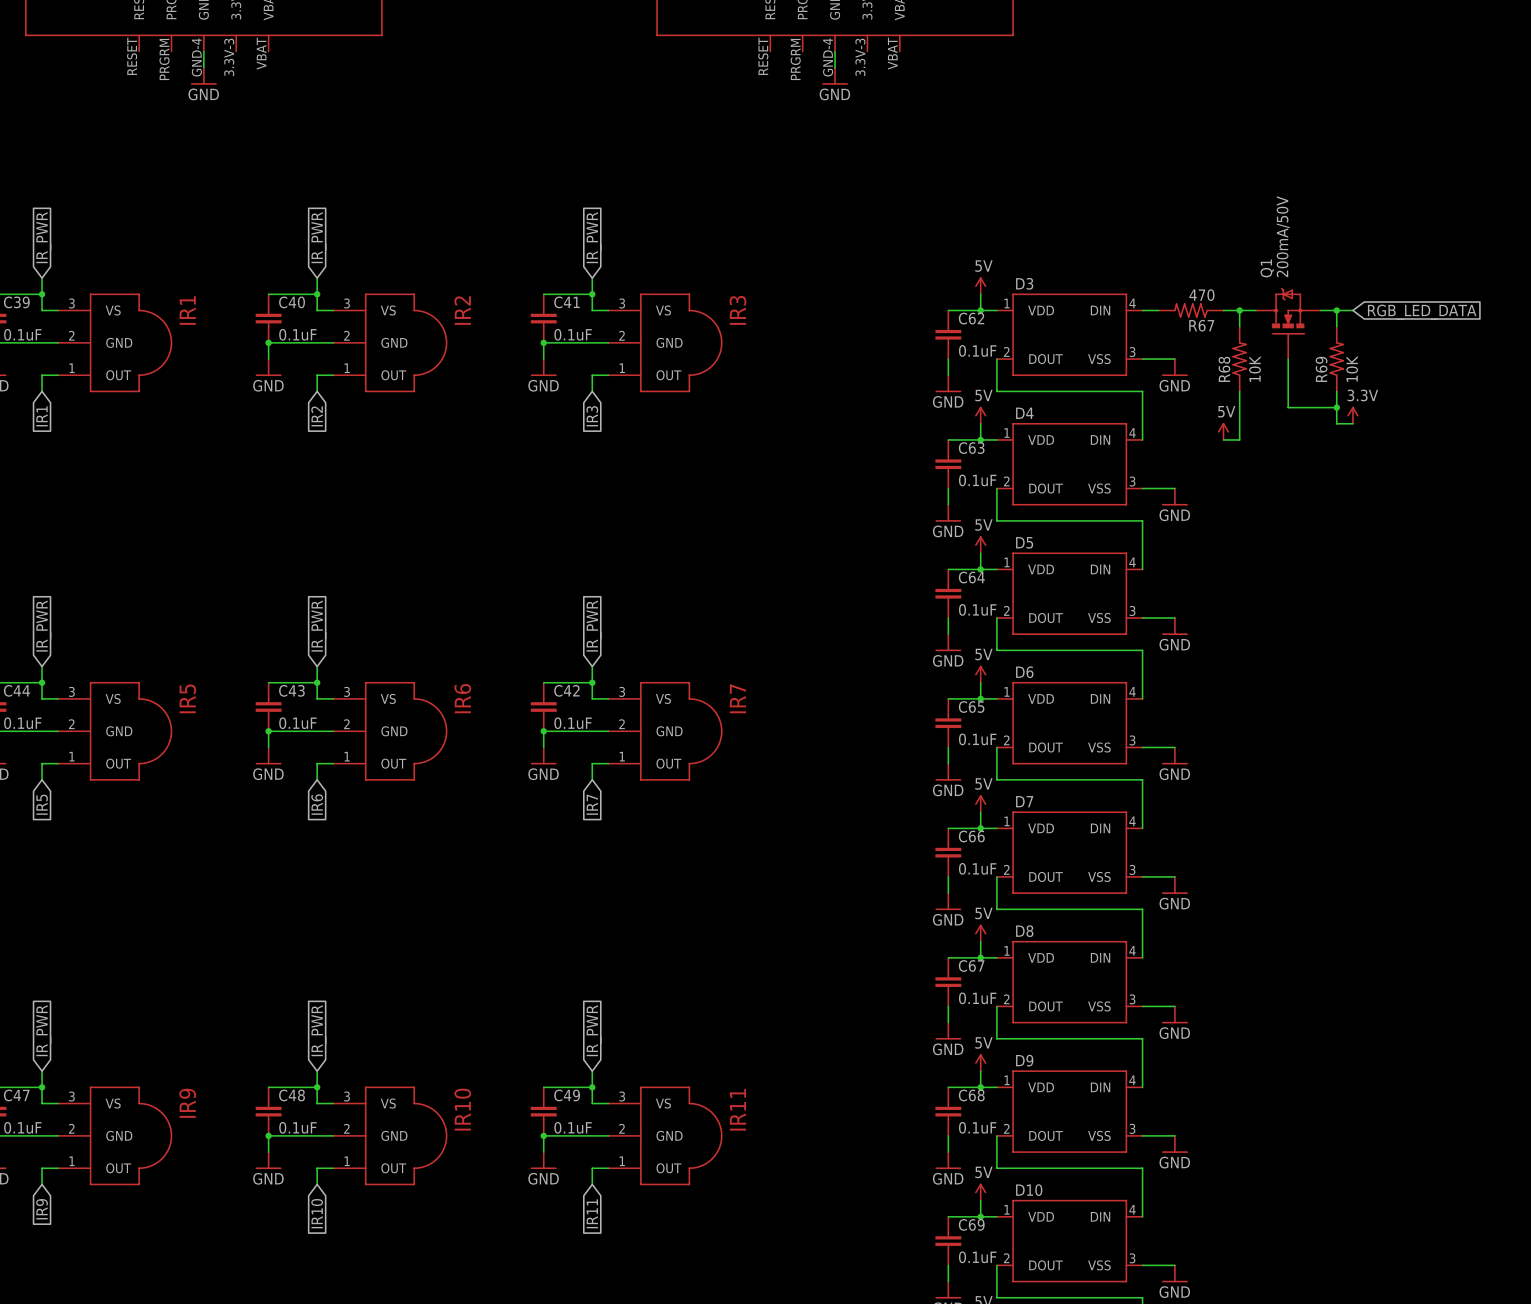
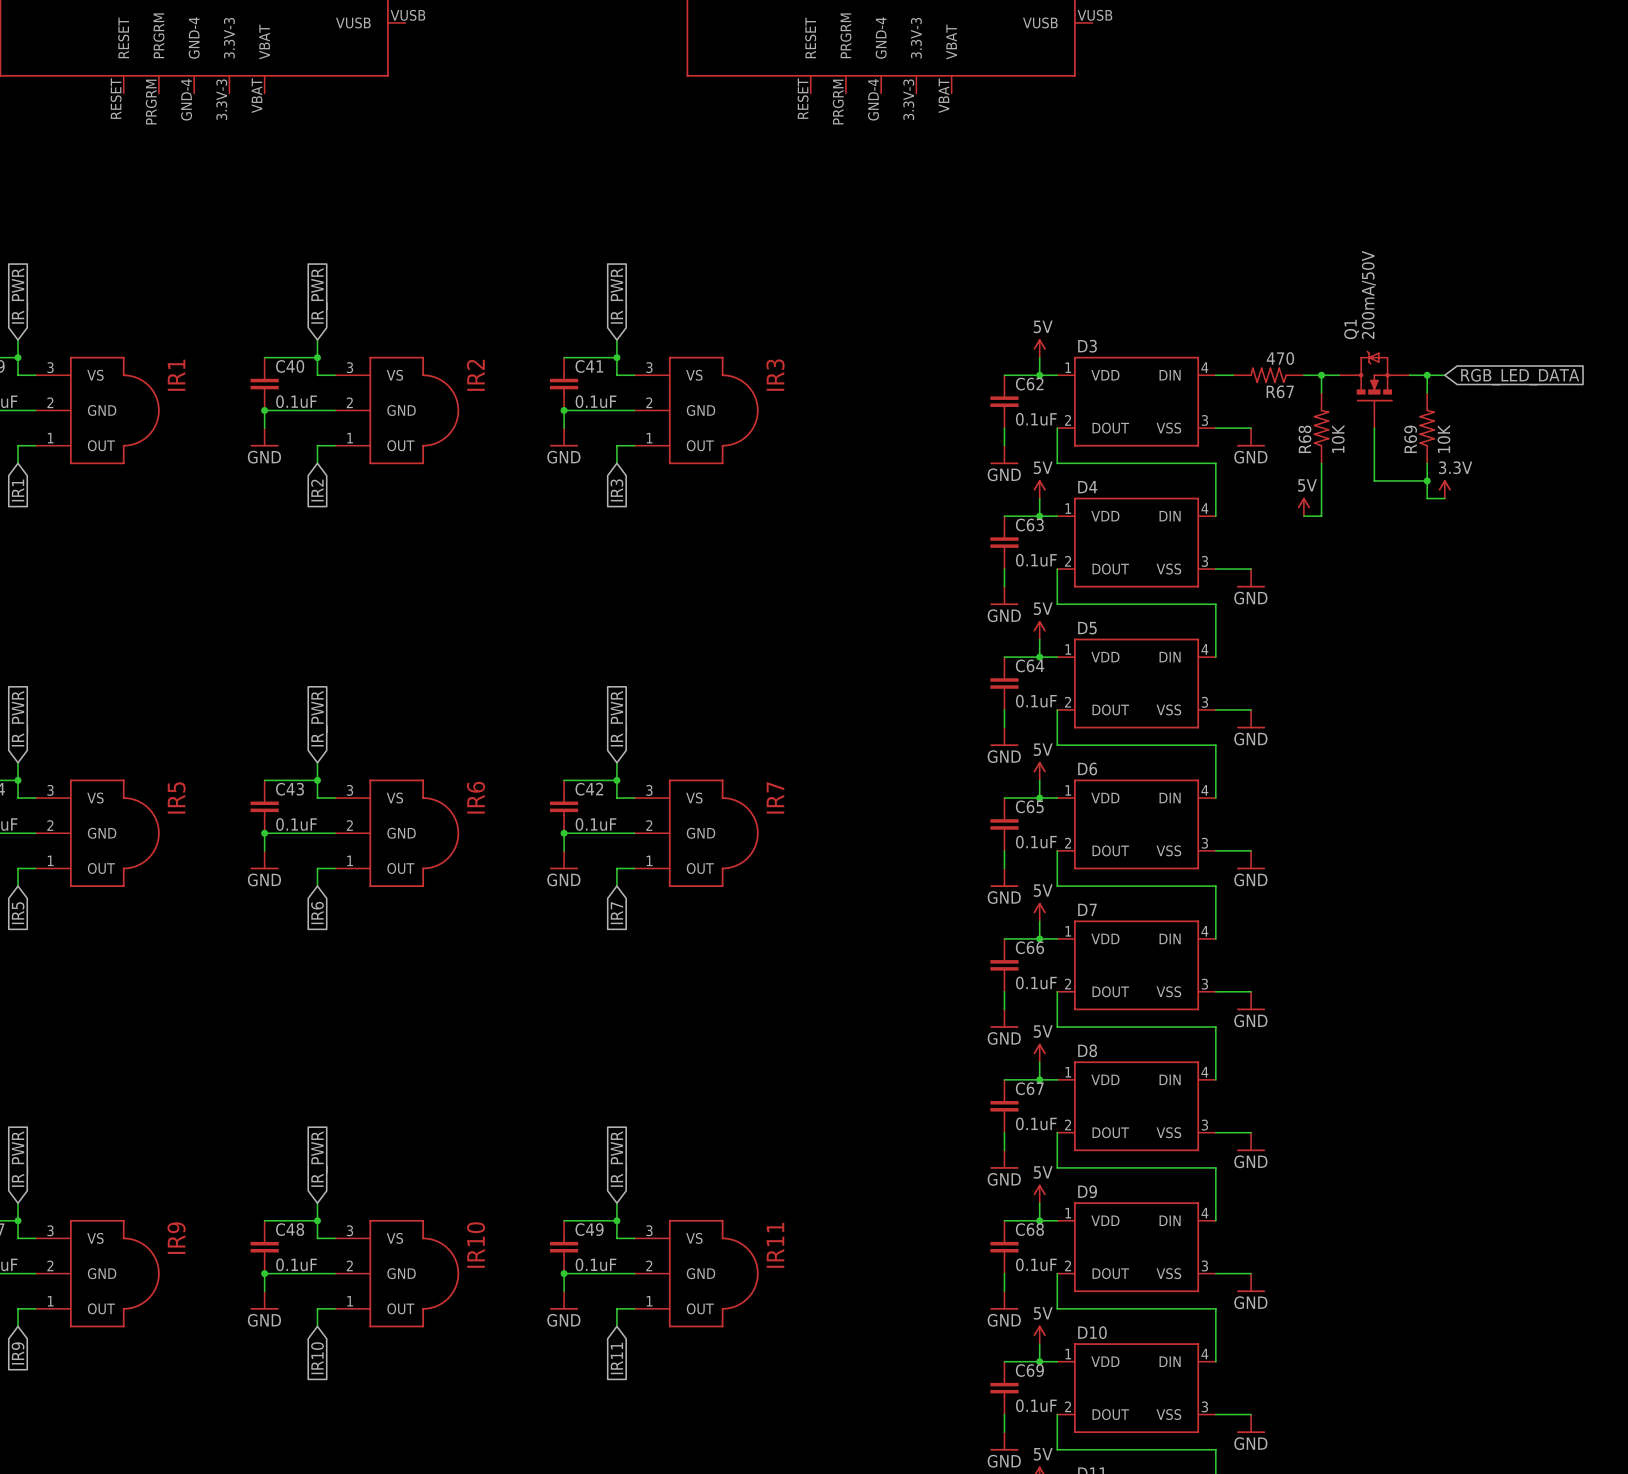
wire: (203, 51) (203, 67) -> none
wire: (835, 51) (835, 67) -> none
power symbol: GND (203, 76) -> none
power symbol: GND (835, 76) -> none

